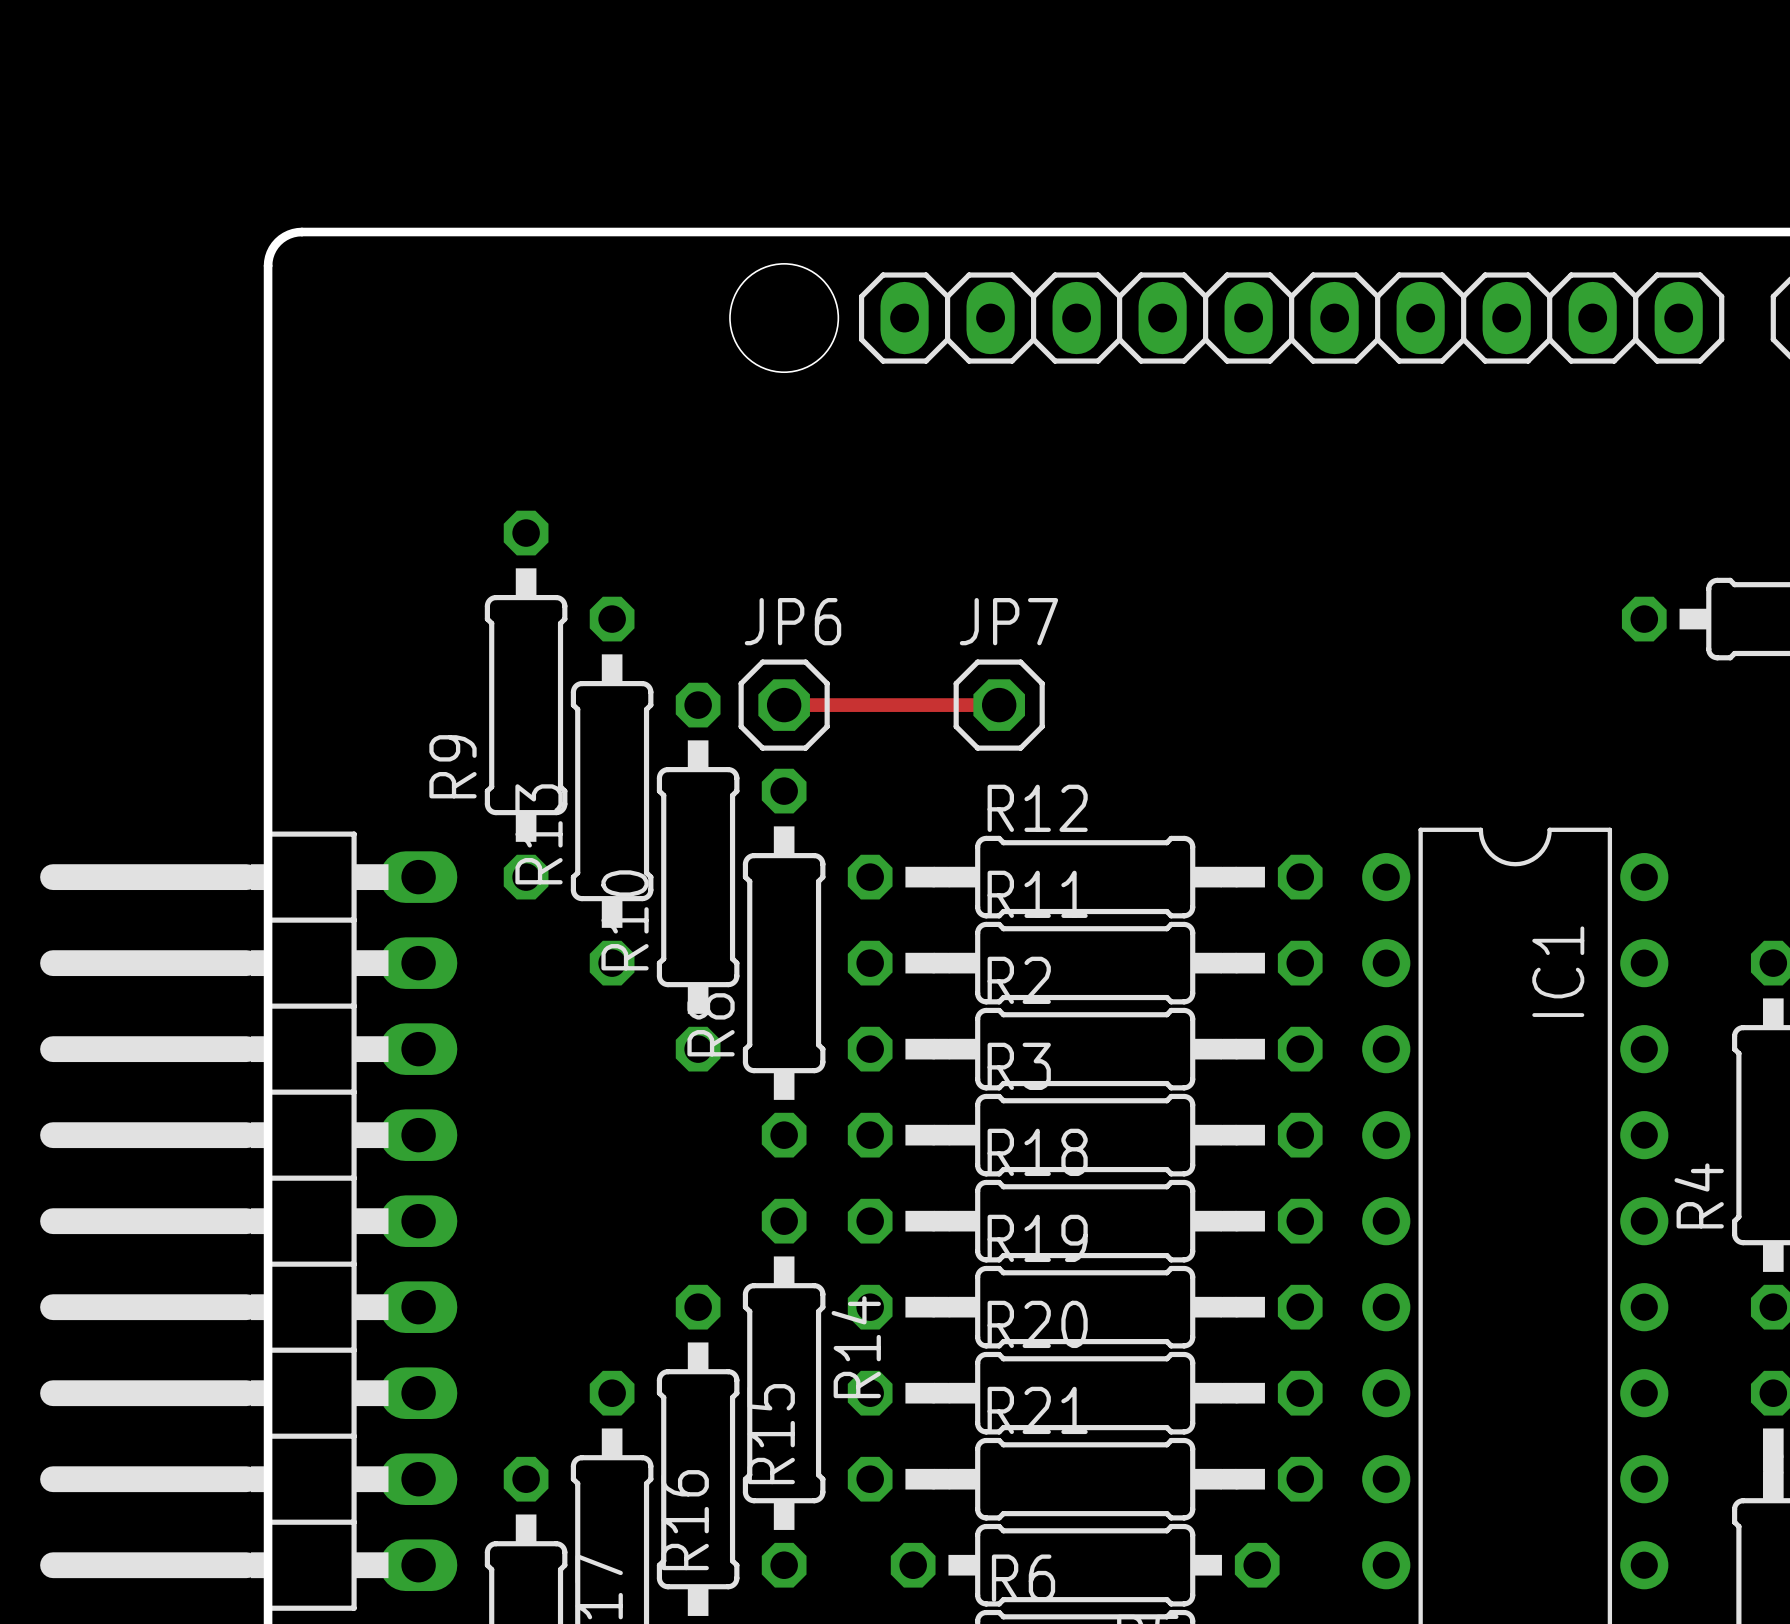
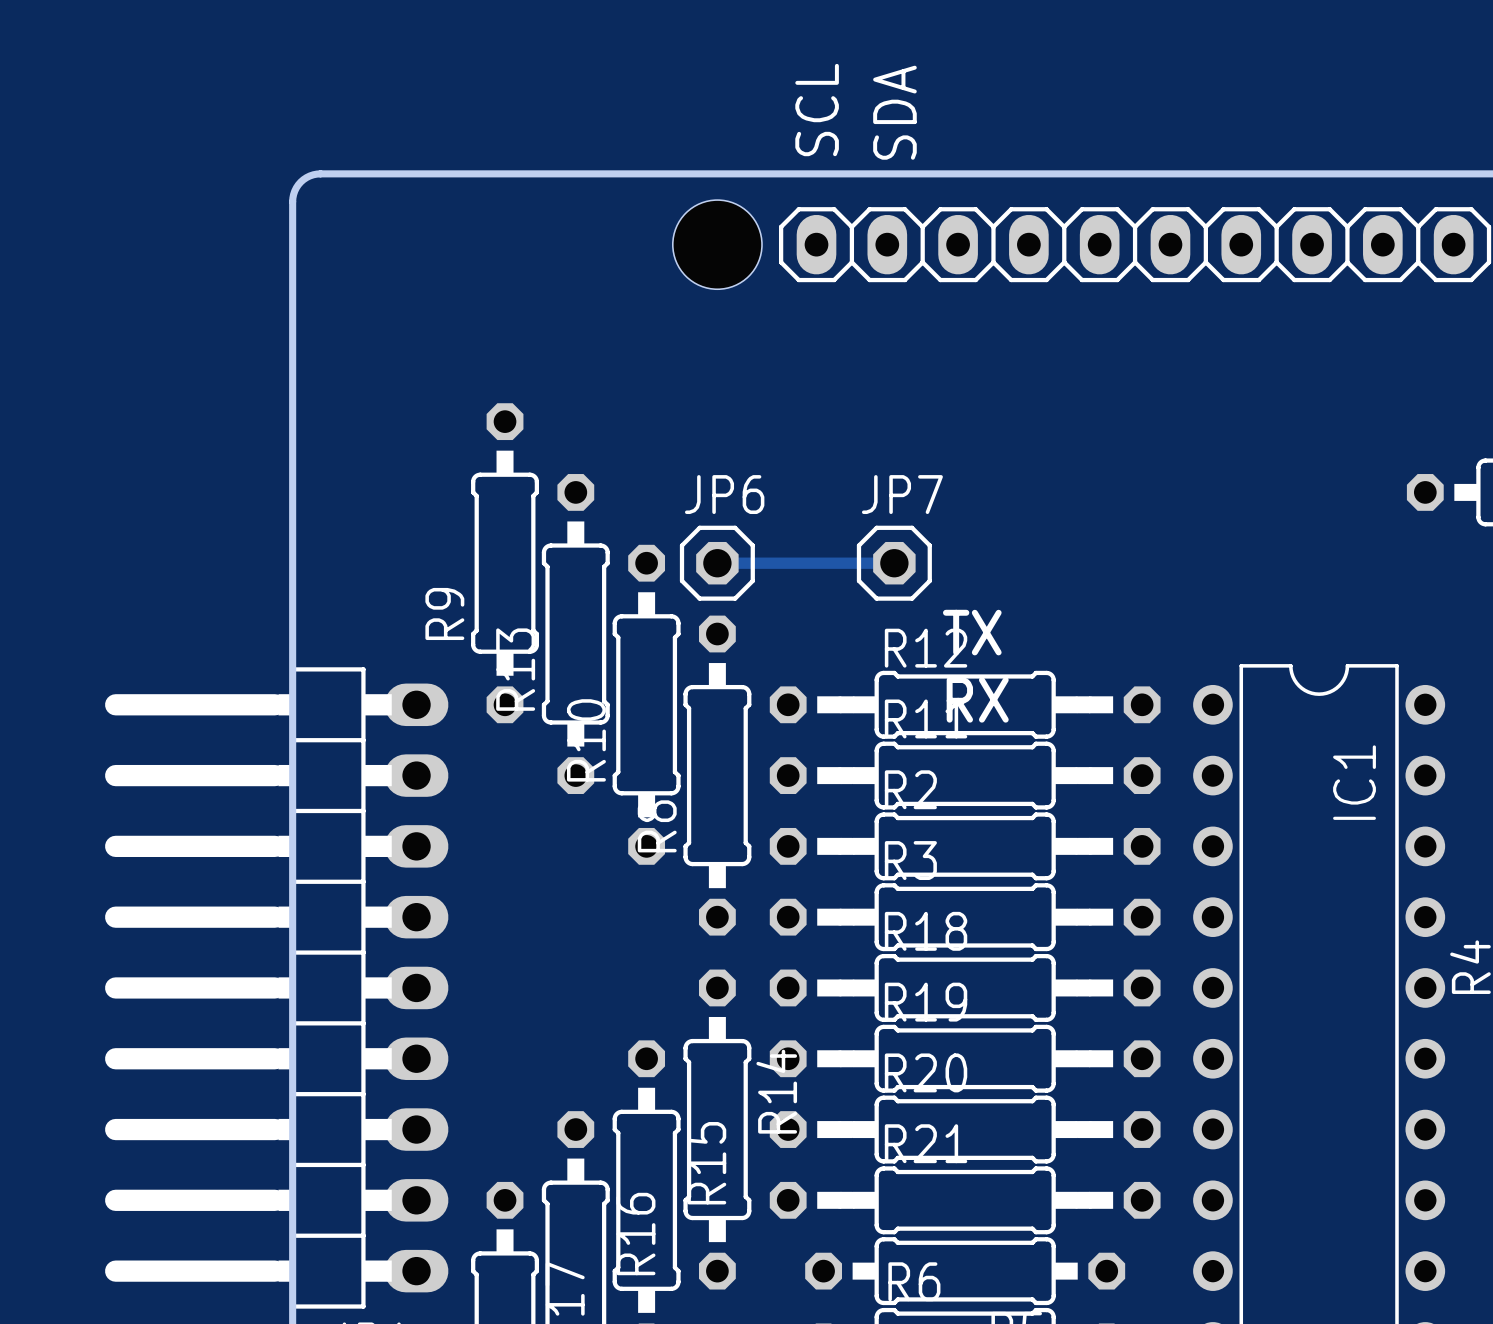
text: none -> SCL (817, 110)
text: none -> SDA (894, 112)
text: none -> TX (972, 632)
text: none -> RX (977, 699)

